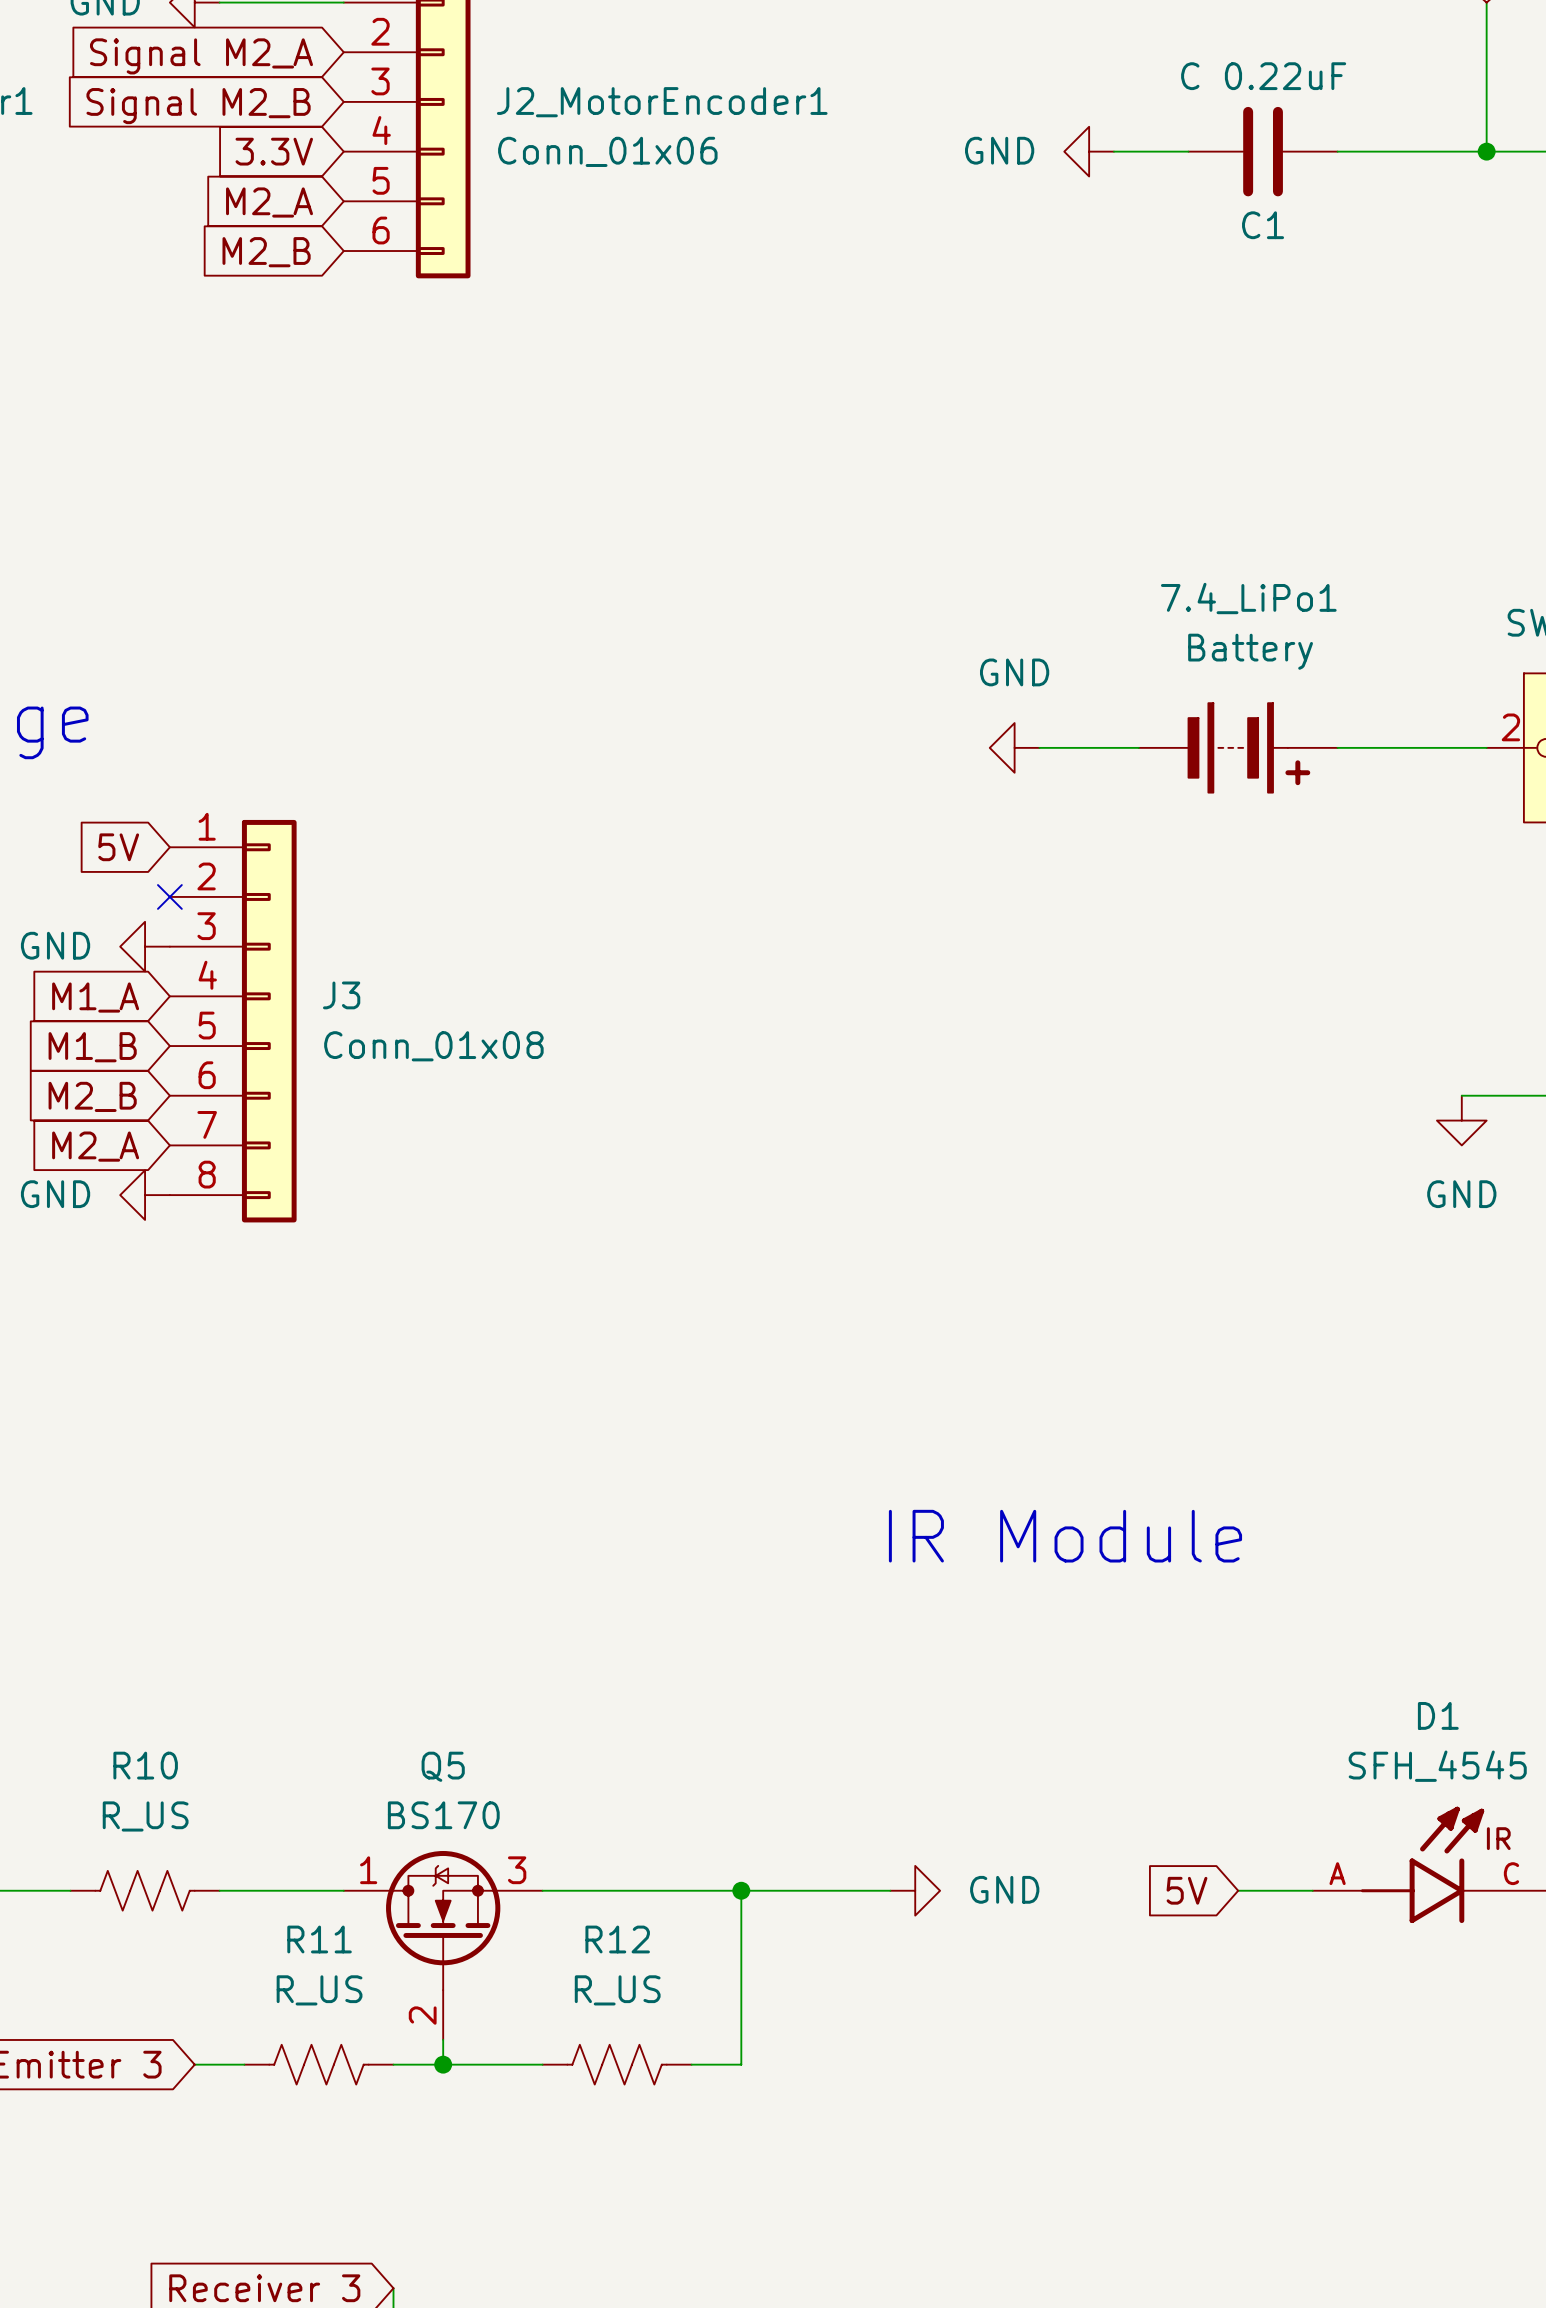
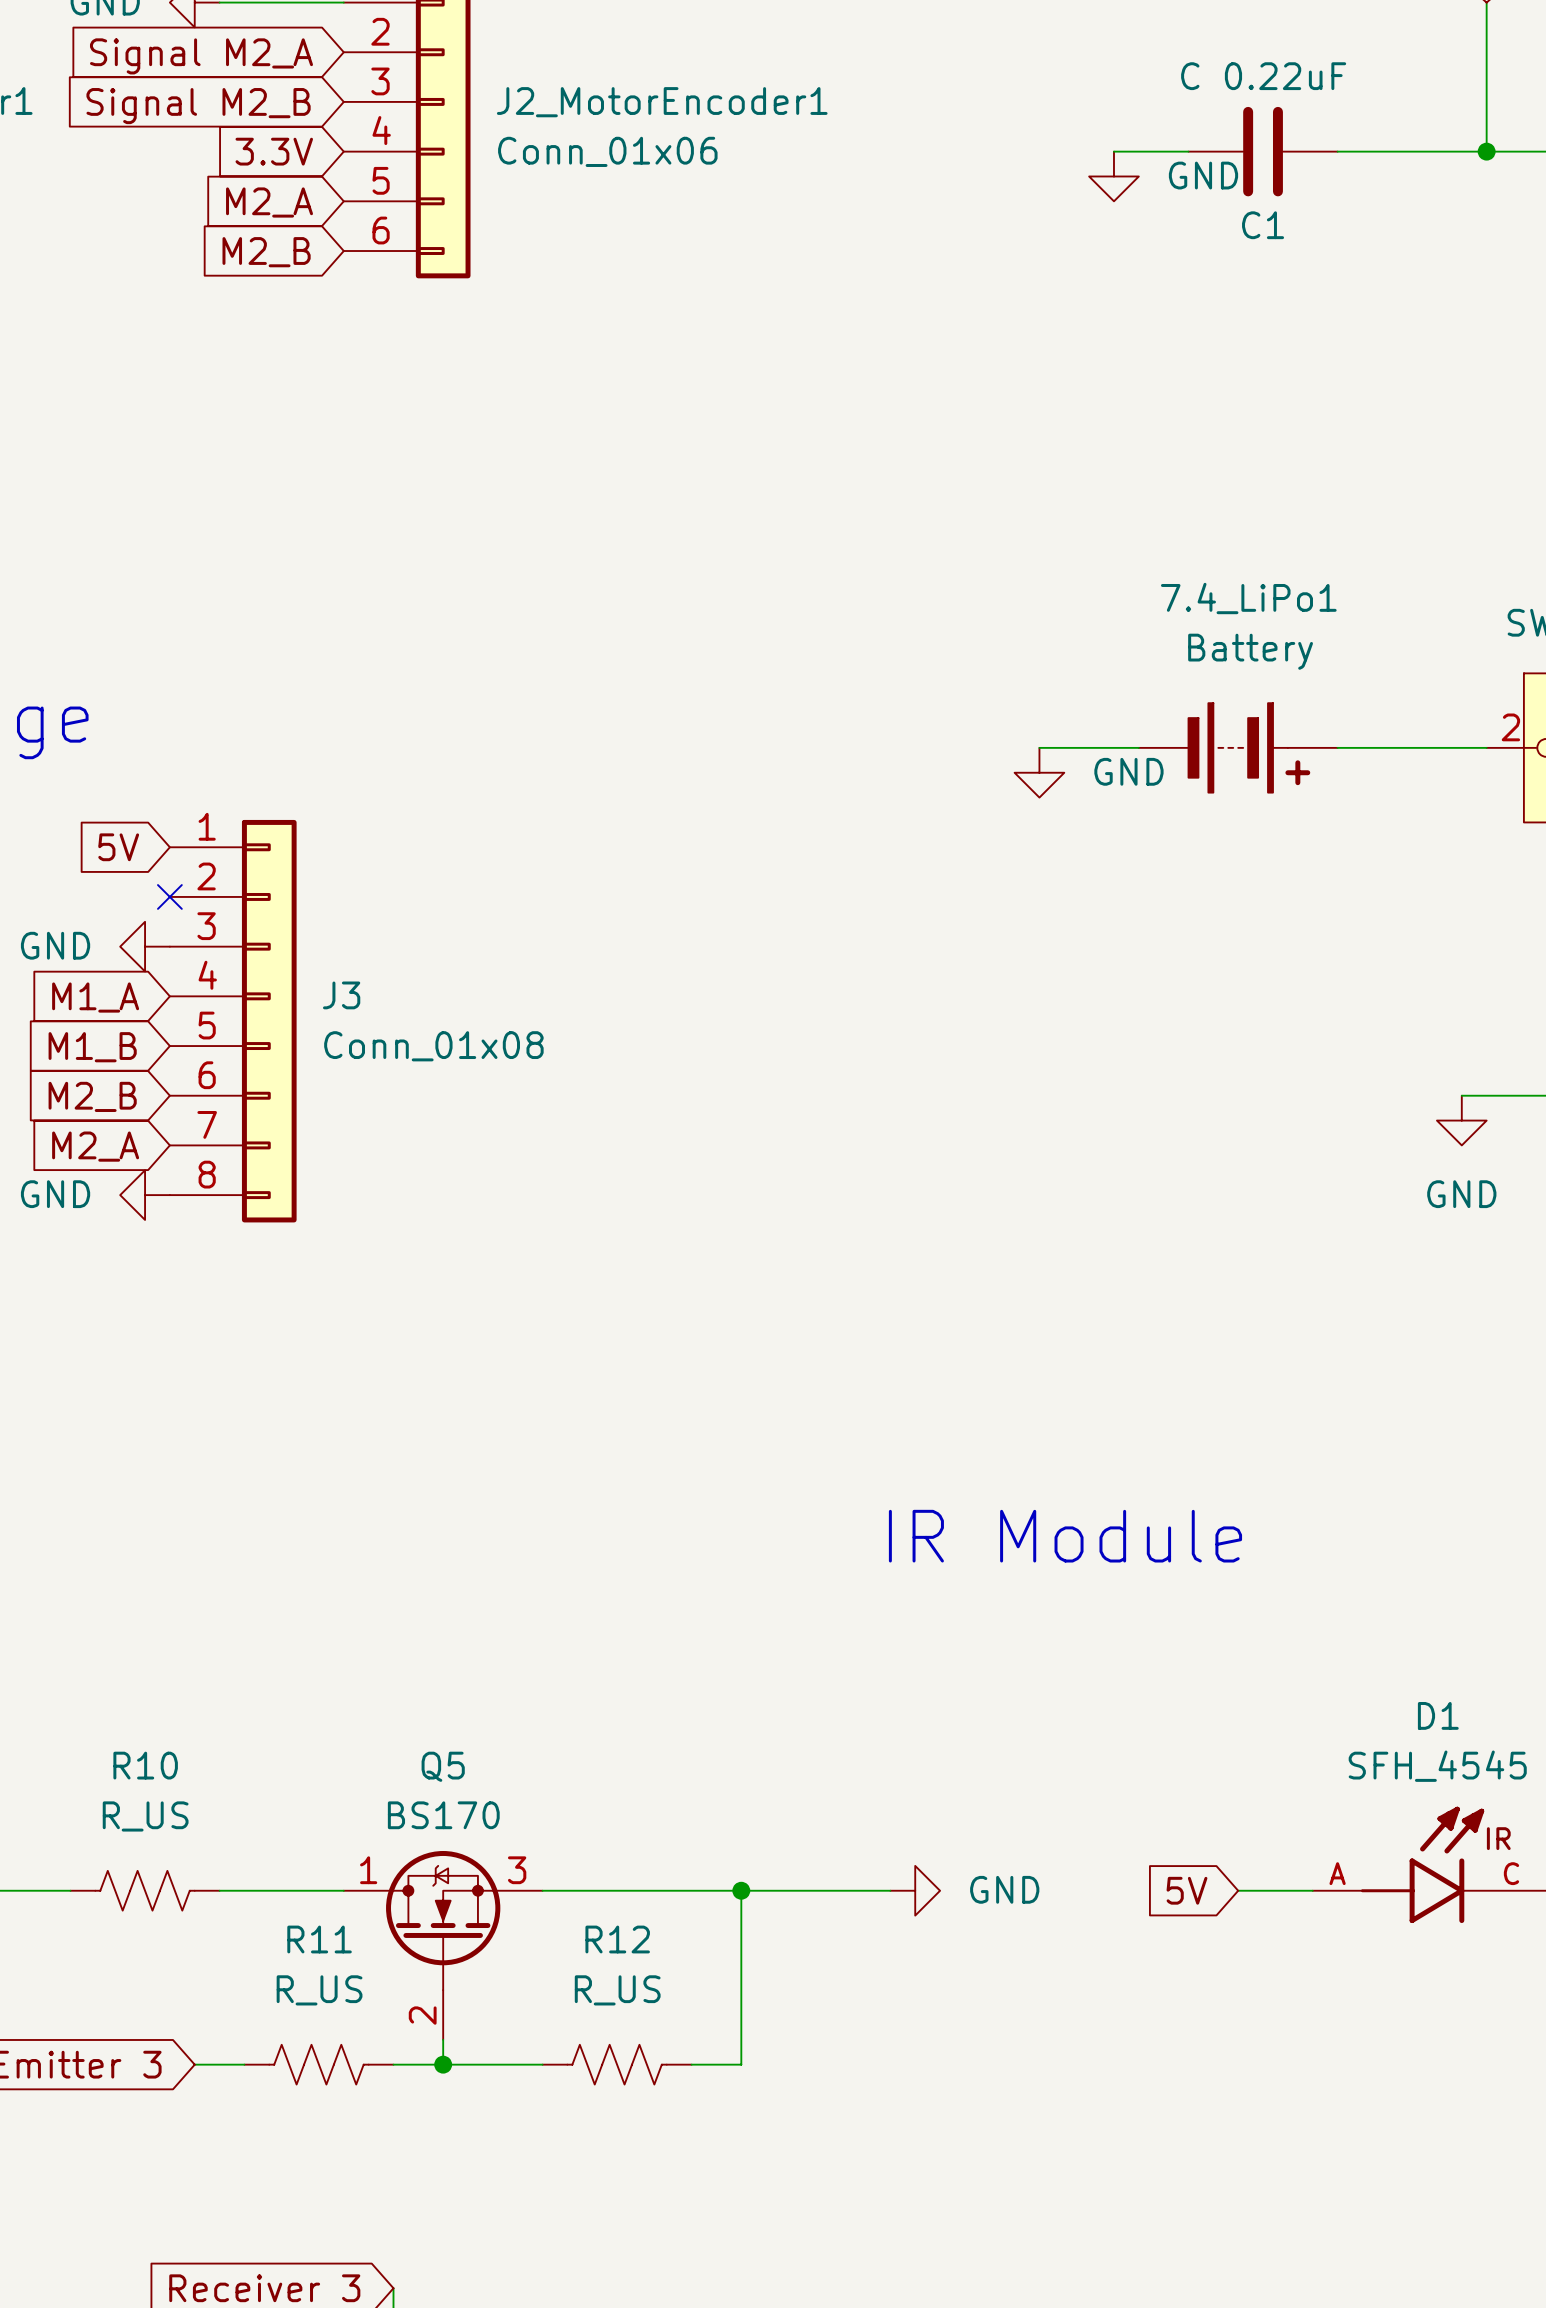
power symbol text position: GND (999, 150) -> GND (1203, 175)
power symbol rotation: 0° (1089, 151) -> 90° counterclockwise (1113, 176)
power symbol position: GND (1089, 151) -> GND (1113, 176)
power symbol text position: GND (1014, 672) -> GND (1128, 771)
power symbol rotation: 0° (1014, 747) -> 90° counterclockwise (1039, 772)
power symbol position: GND (1014, 747) -> GND (1039, 772)

